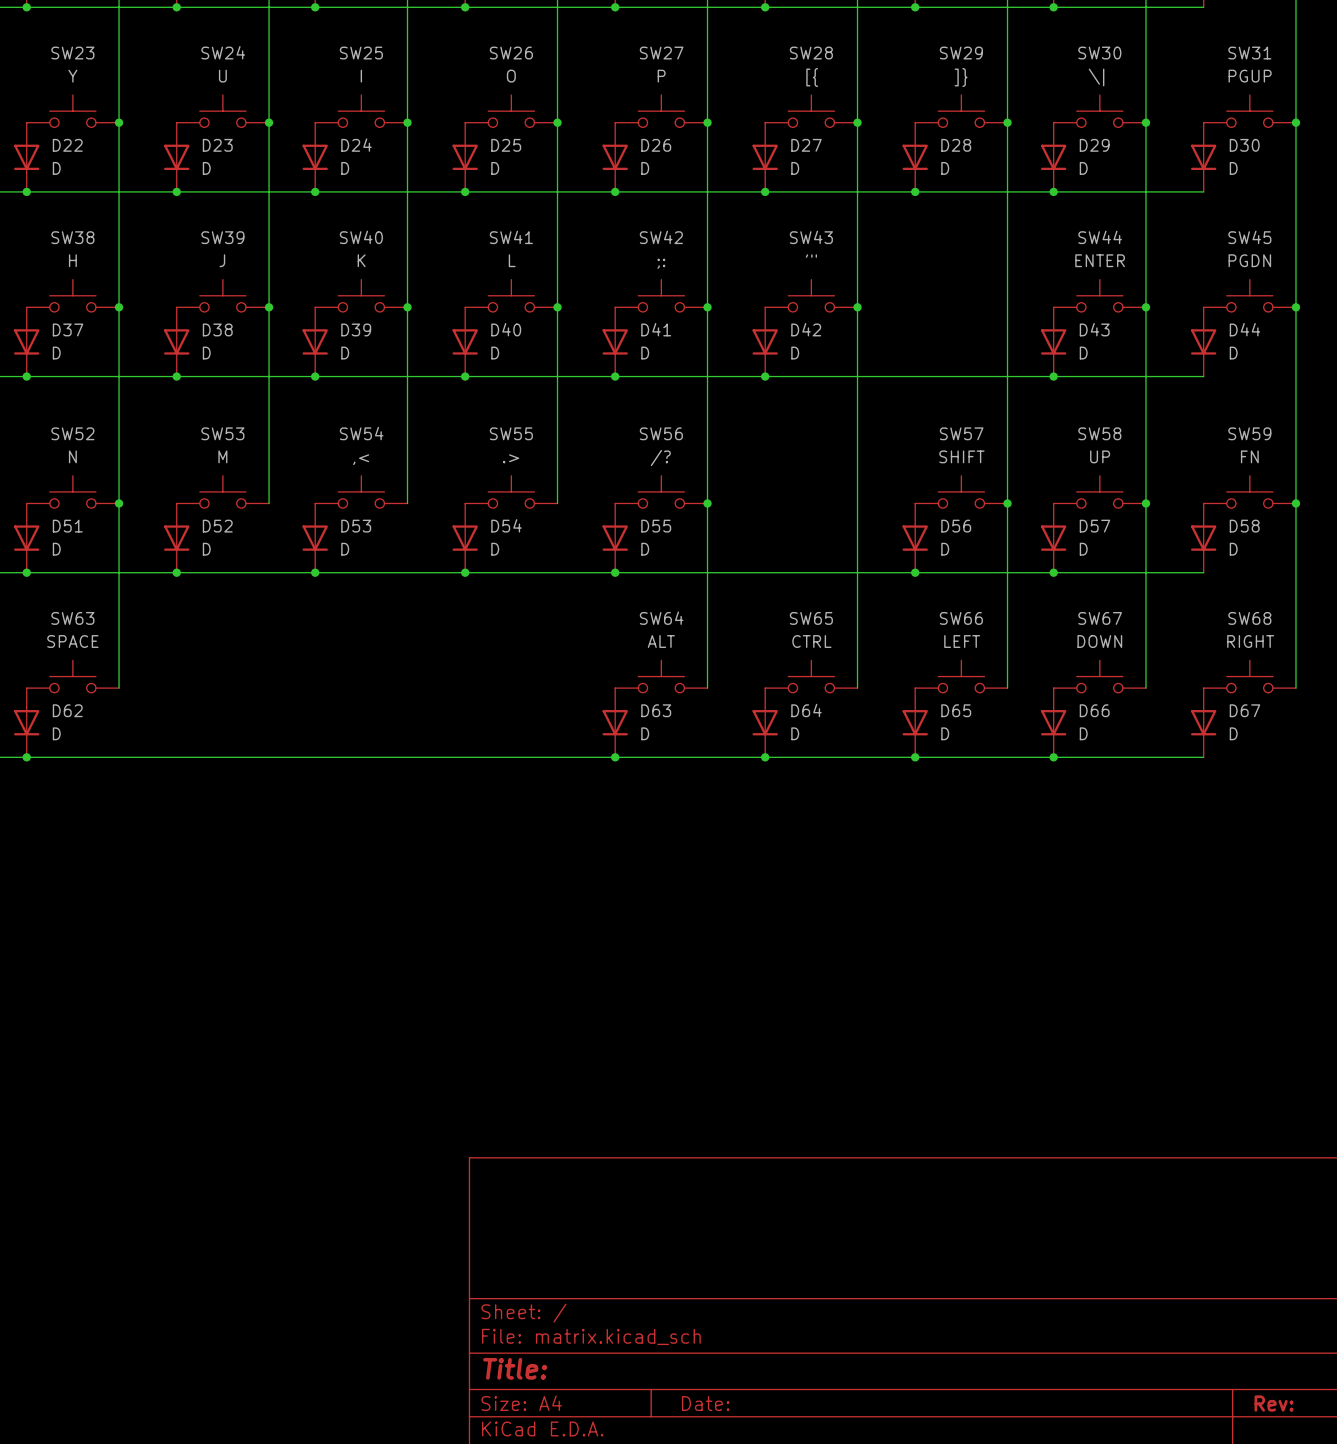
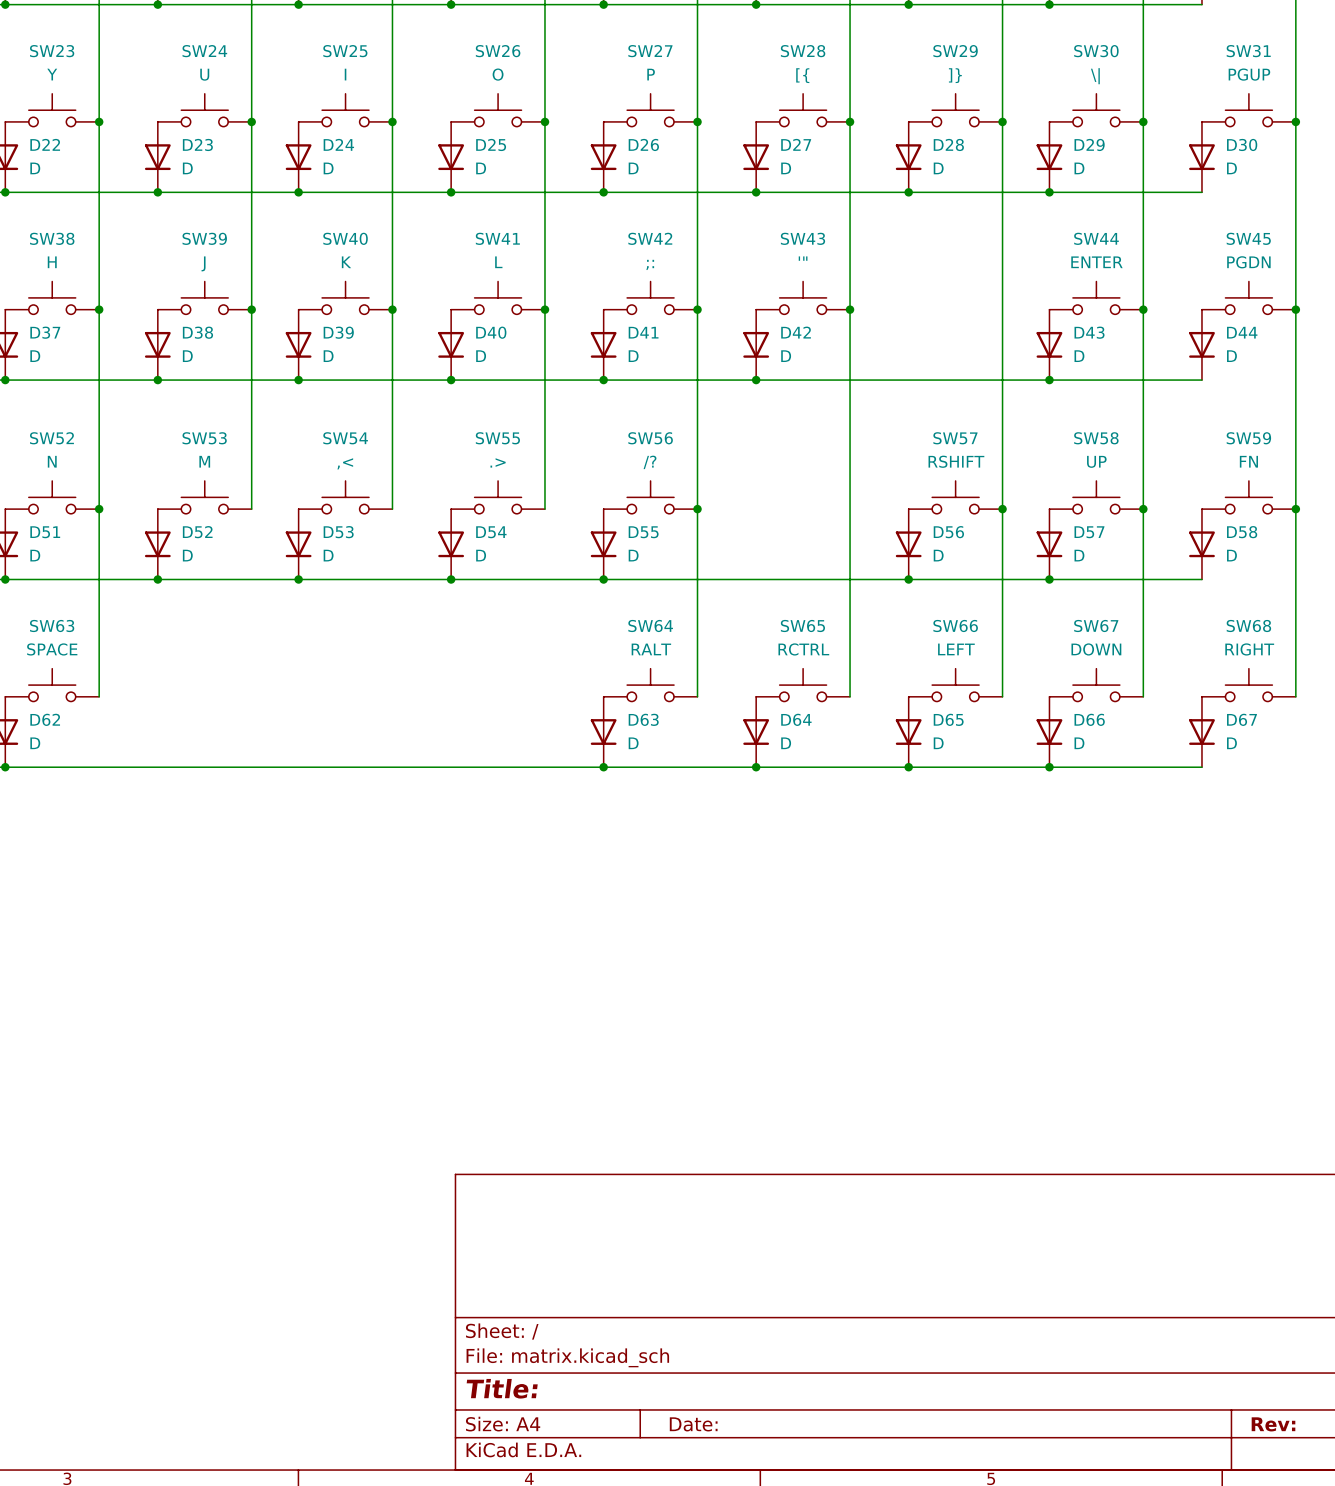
SW57 value: SHIFT (961, 456) -> RSHIFT (956, 461)
SW64 value: ALT (661, 641) -> RALT (651, 649)
SW65 value: CTRL (811, 641) -> RCTRL (803, 649)

